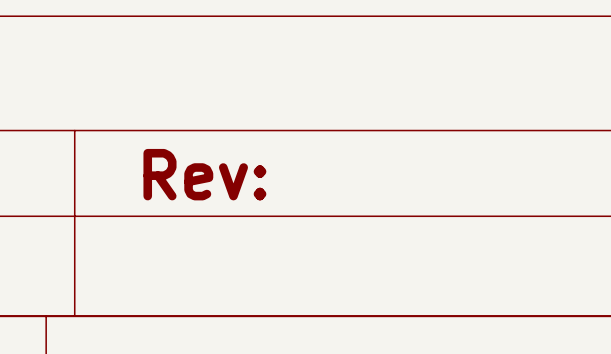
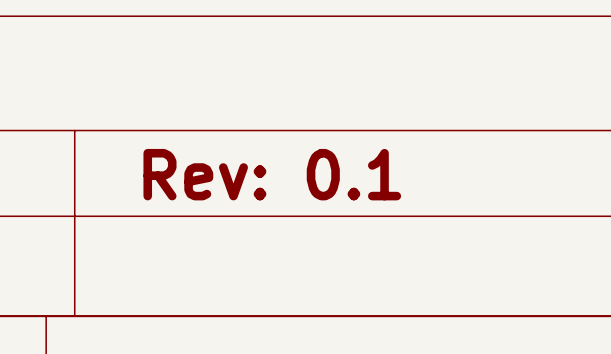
title block: Rev: (204, 174) -> Rev: 0.1 (272, 174)

